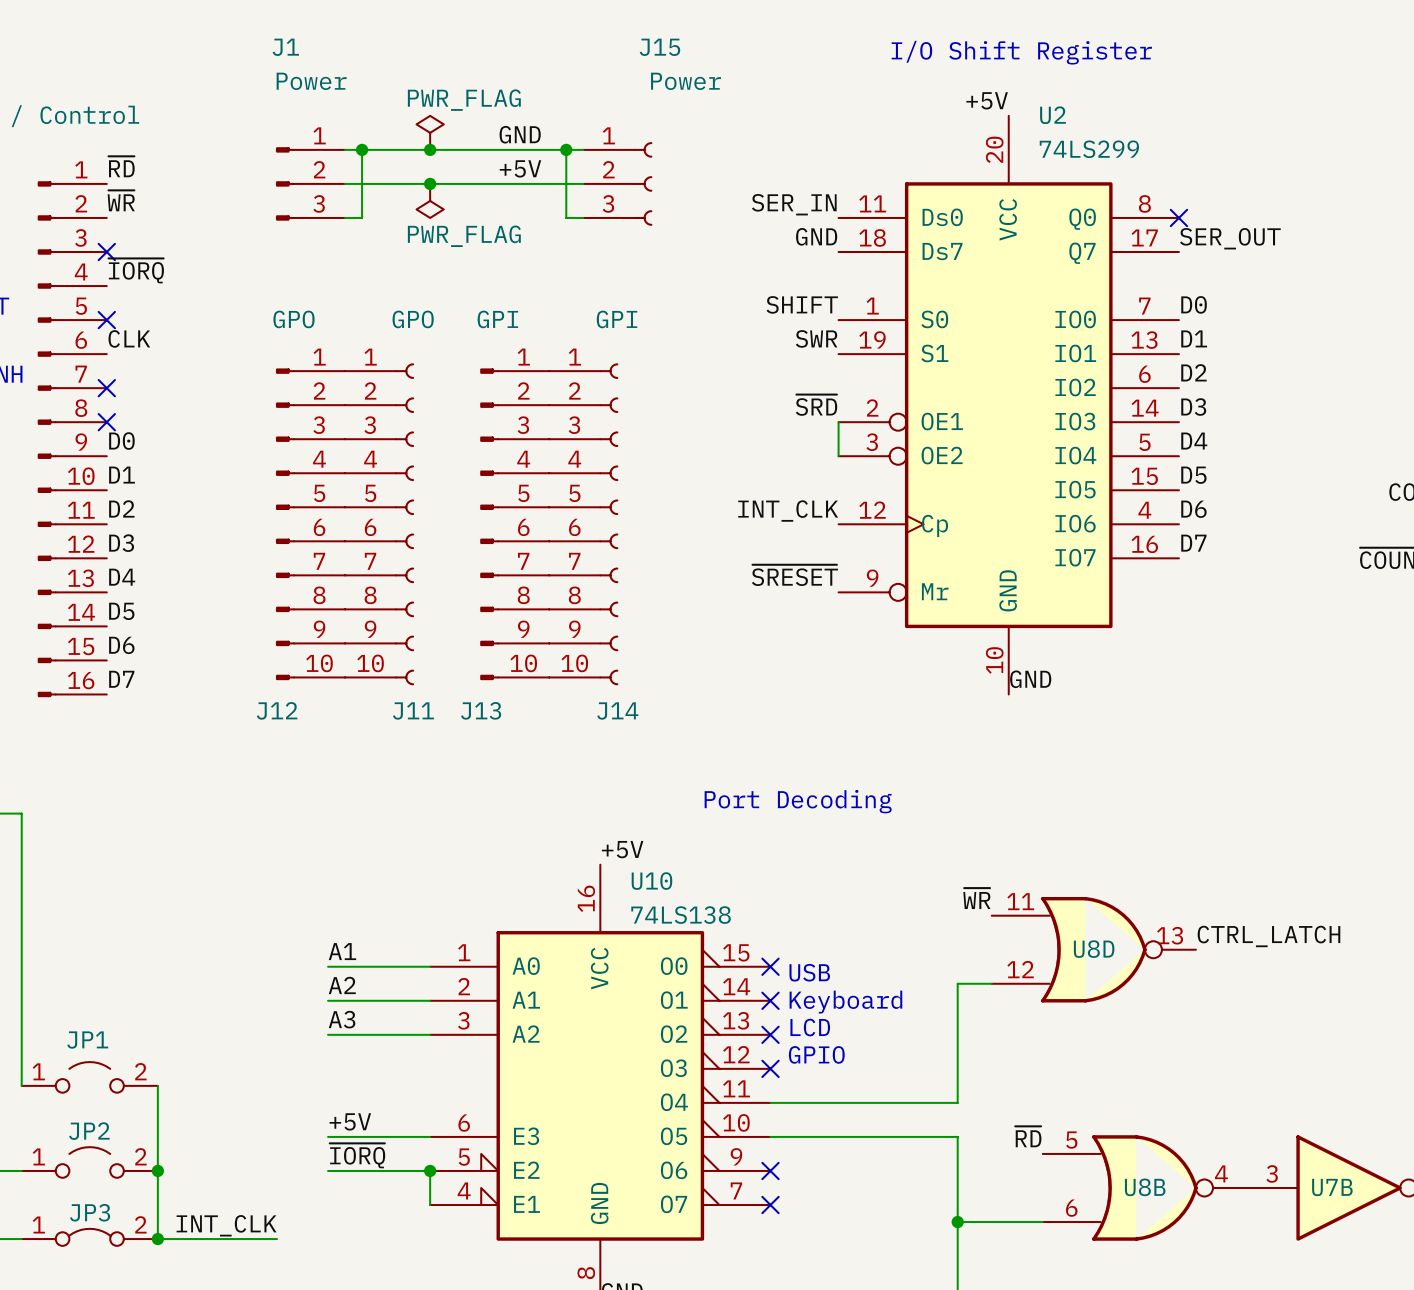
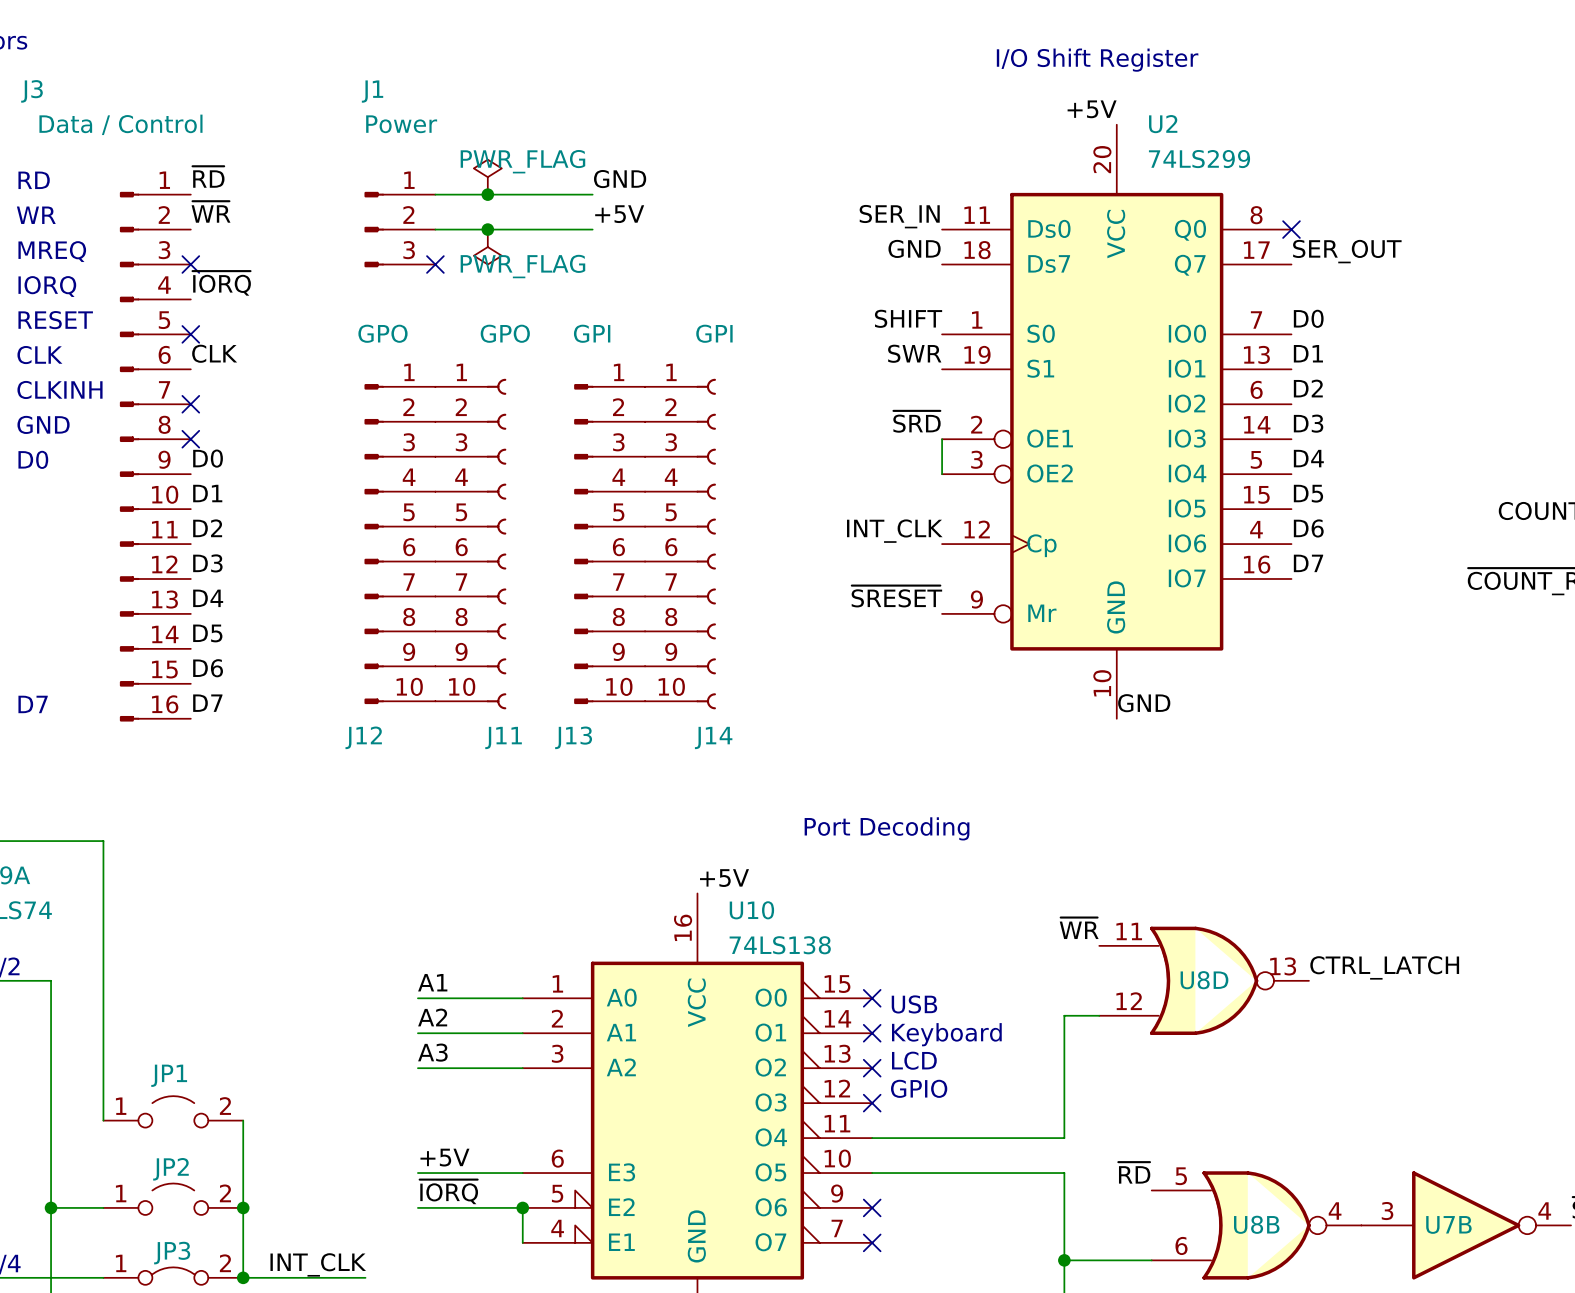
power symbol: PWR_FLAG (430, 132) -> none
label: GND (520, 134) -> none
wire: (345, 149) (583, 149) -> none
wire: (362, 149) (362, 217) -> (592, 229) (452, 229)
junction: (362, 149) -> none
junction: (430, 149) -> none
wire: (566, 149) (566, 217) (583, 217) -> none
junction: (566, 149) -> none
power symbol: none -> PWR_FLAG (487, 177)
label: +5V (520, 168) -> GND (620, 179)
J1 position: (310, 183) -> (399, 229)
junction: none -> (487, 194)
junction: (430, 183) -> none
wire: (498, 183) (583, 183) -> none
J15: Power (617, 183) -> none
power symbol: PWR_FLAG (430, 200) -> none
label: none -> +5V (619, 214)
junction: none -> (487, 229)
power symbol: none -> PWR_FLAG (487, 247)
no-connect mark: none -> (435, 264)

